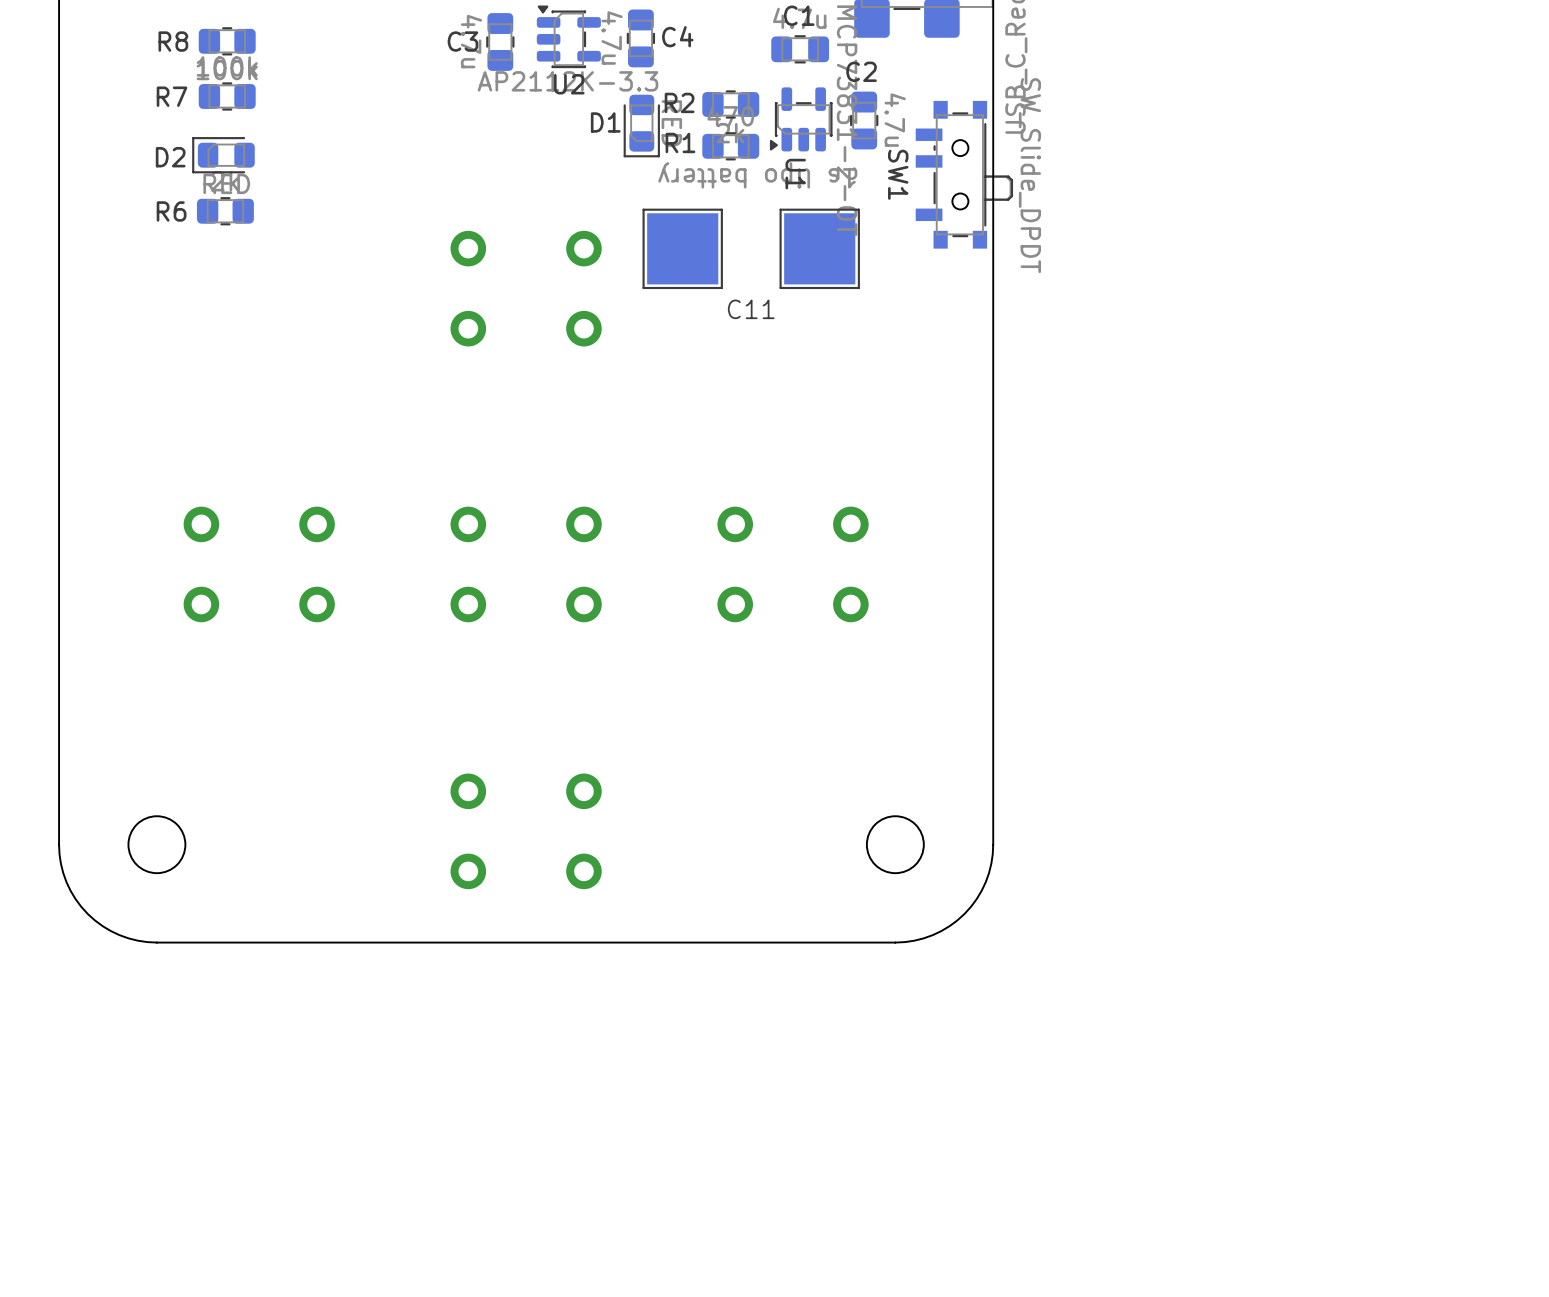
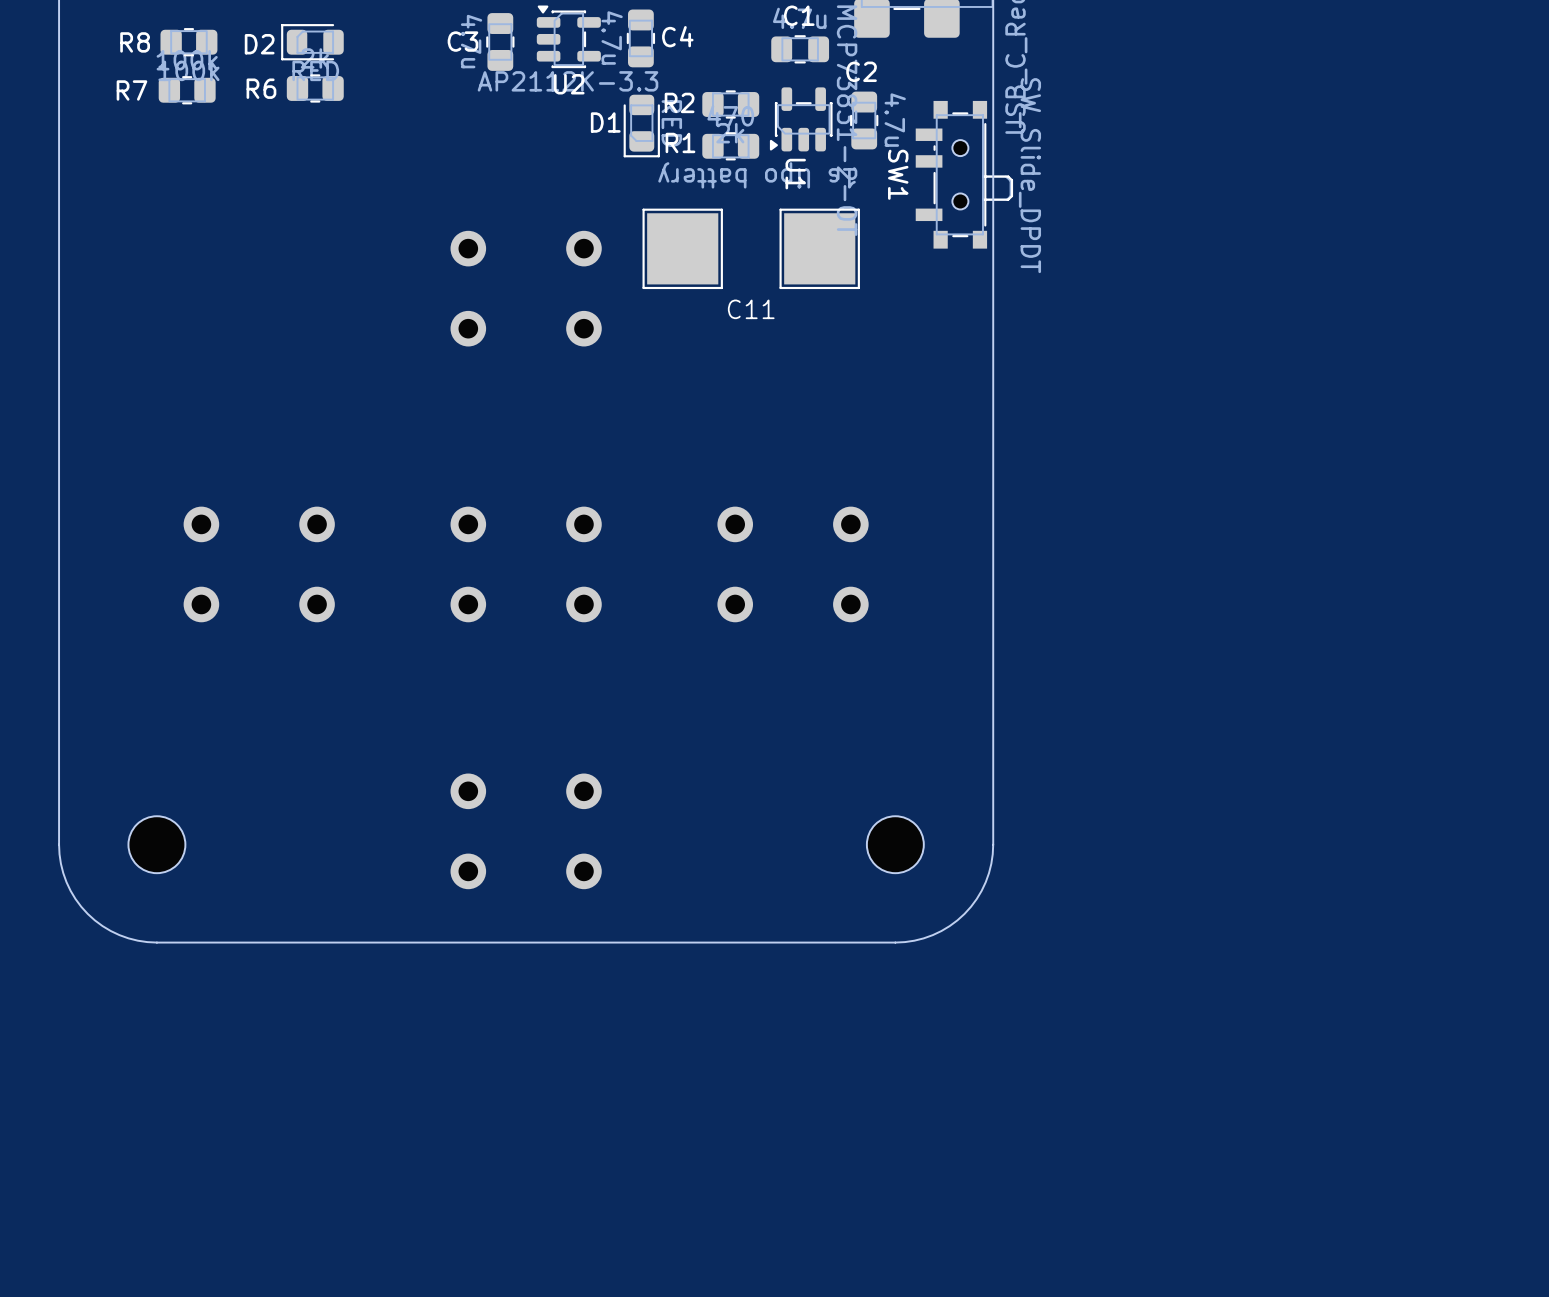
R8 position: (227, 41) -> (188, 42)
R7 position: (227, 96) -> (187, 90)
D2 position: (223, 155) -> (312, 42)
R6 position: (225, 211) -> (315, 88)

